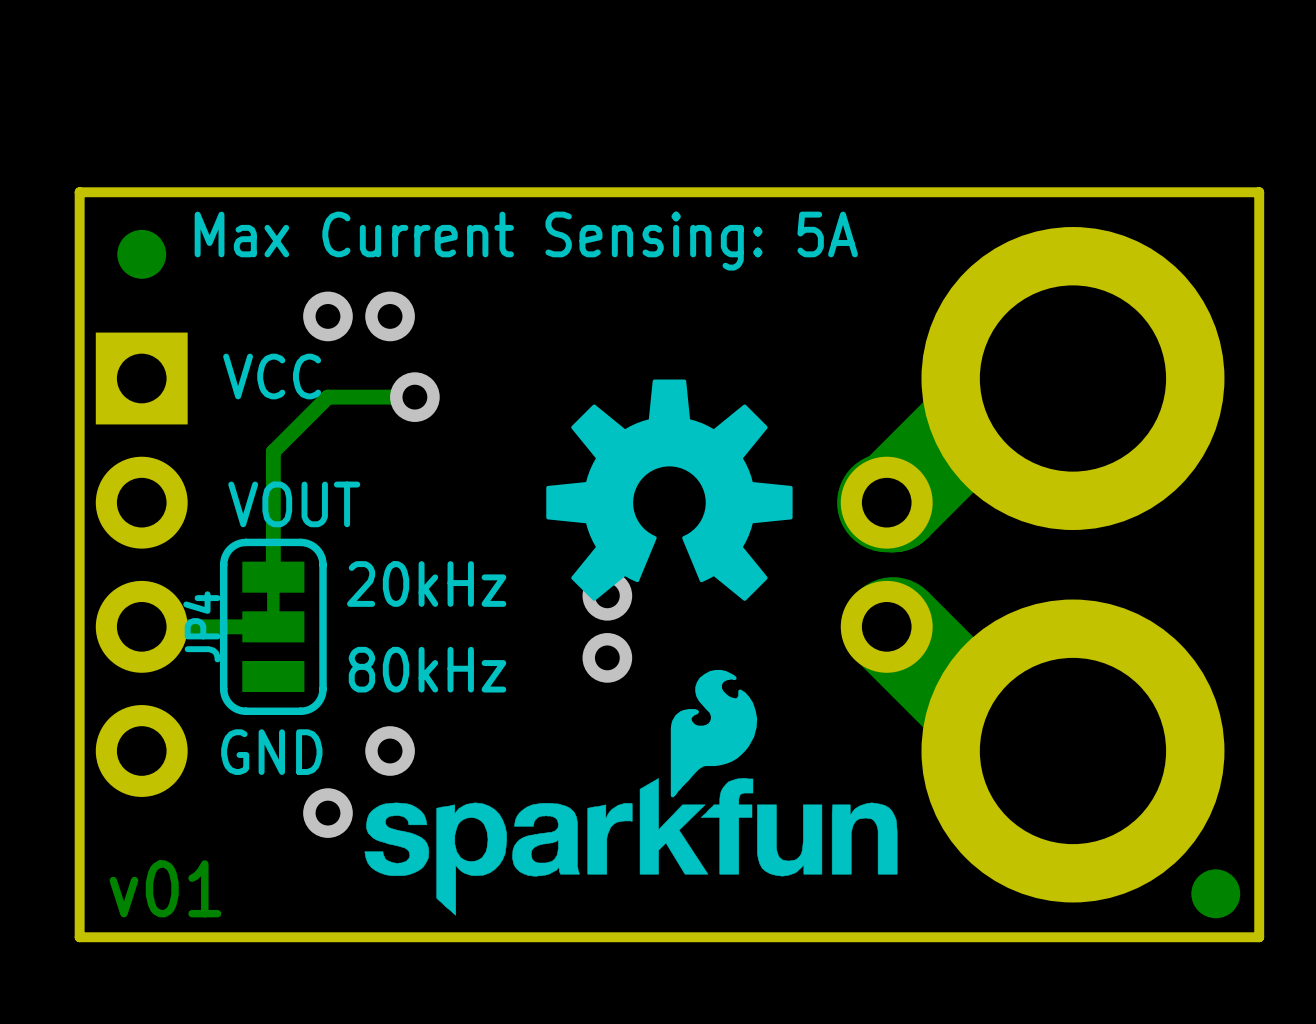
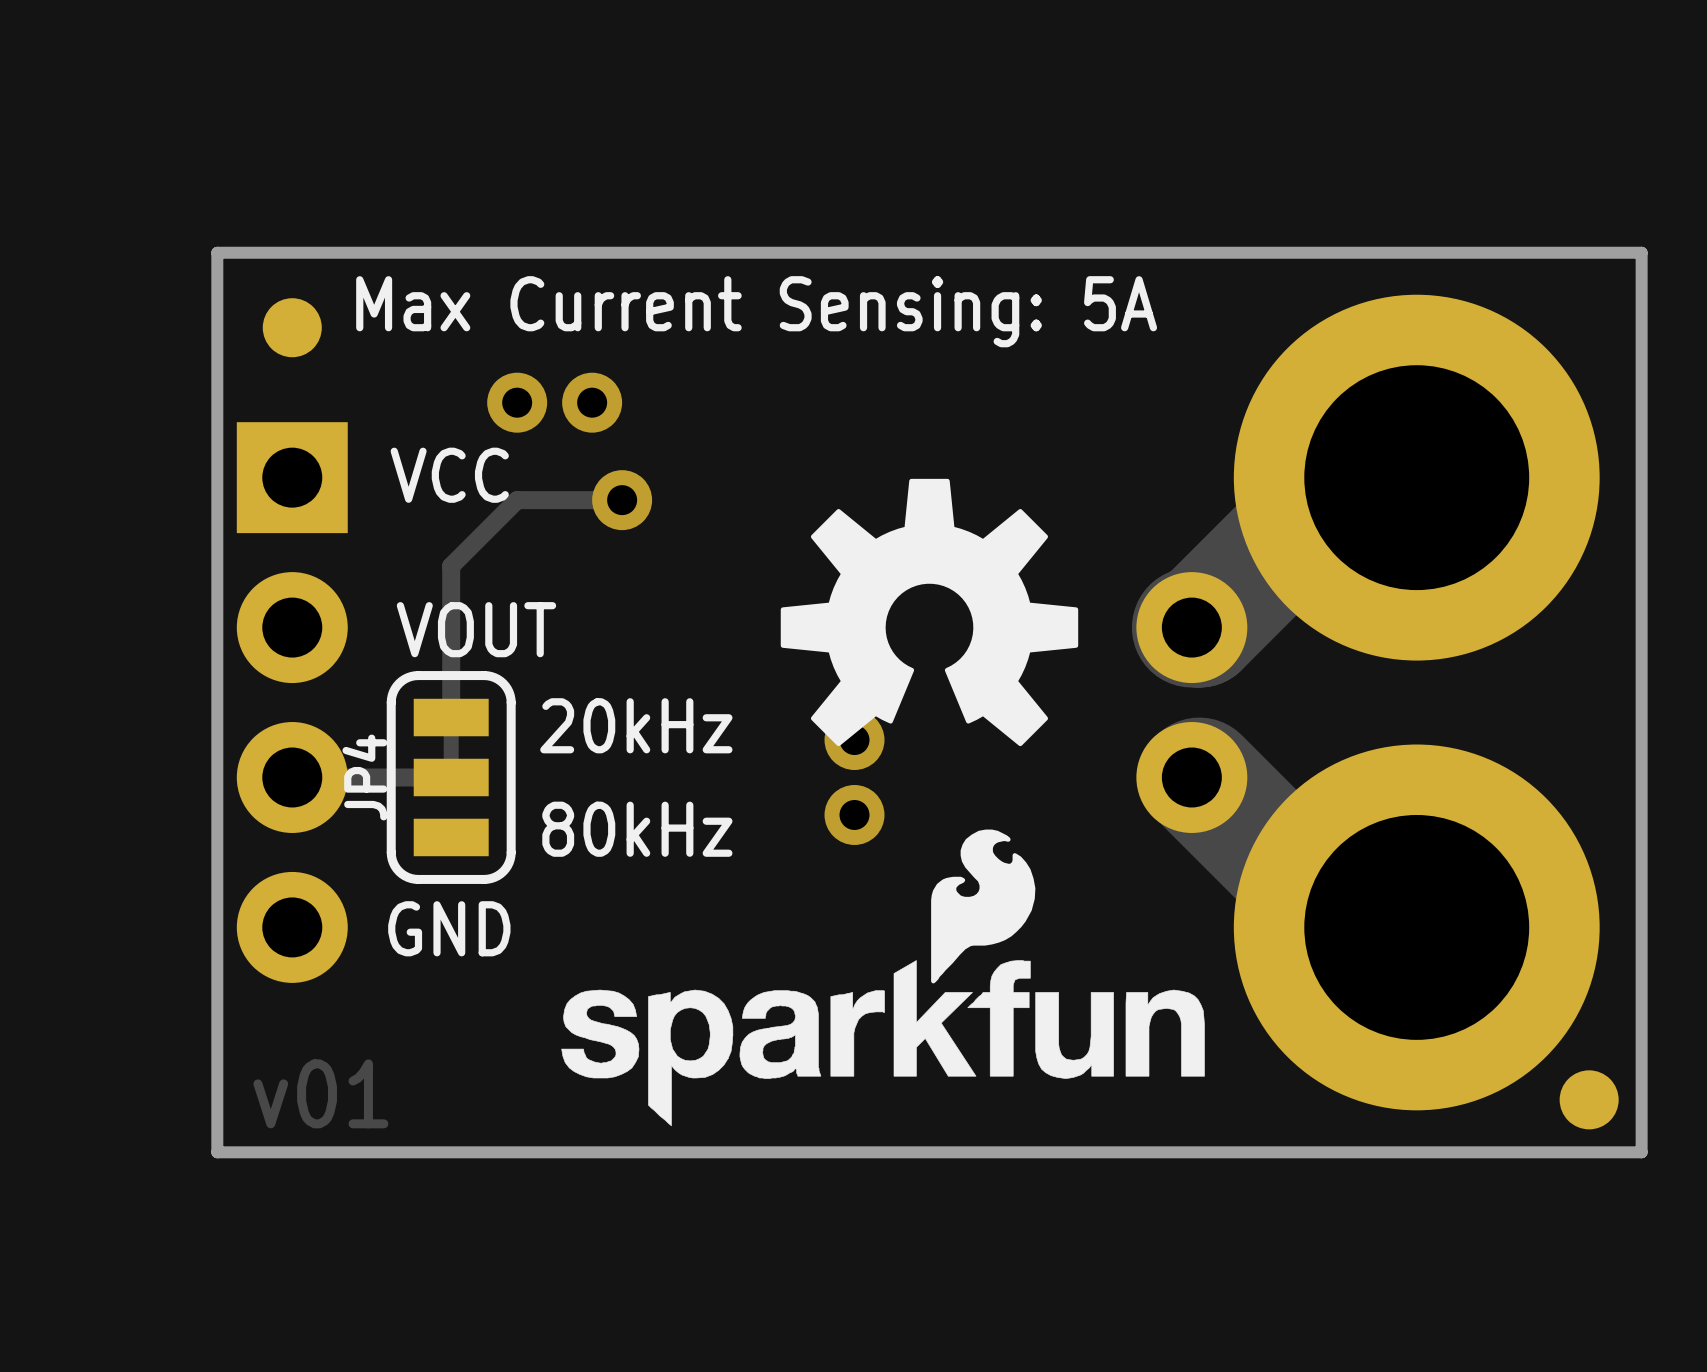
via: (390, 751) -> none
via: (327, 813) -> none

